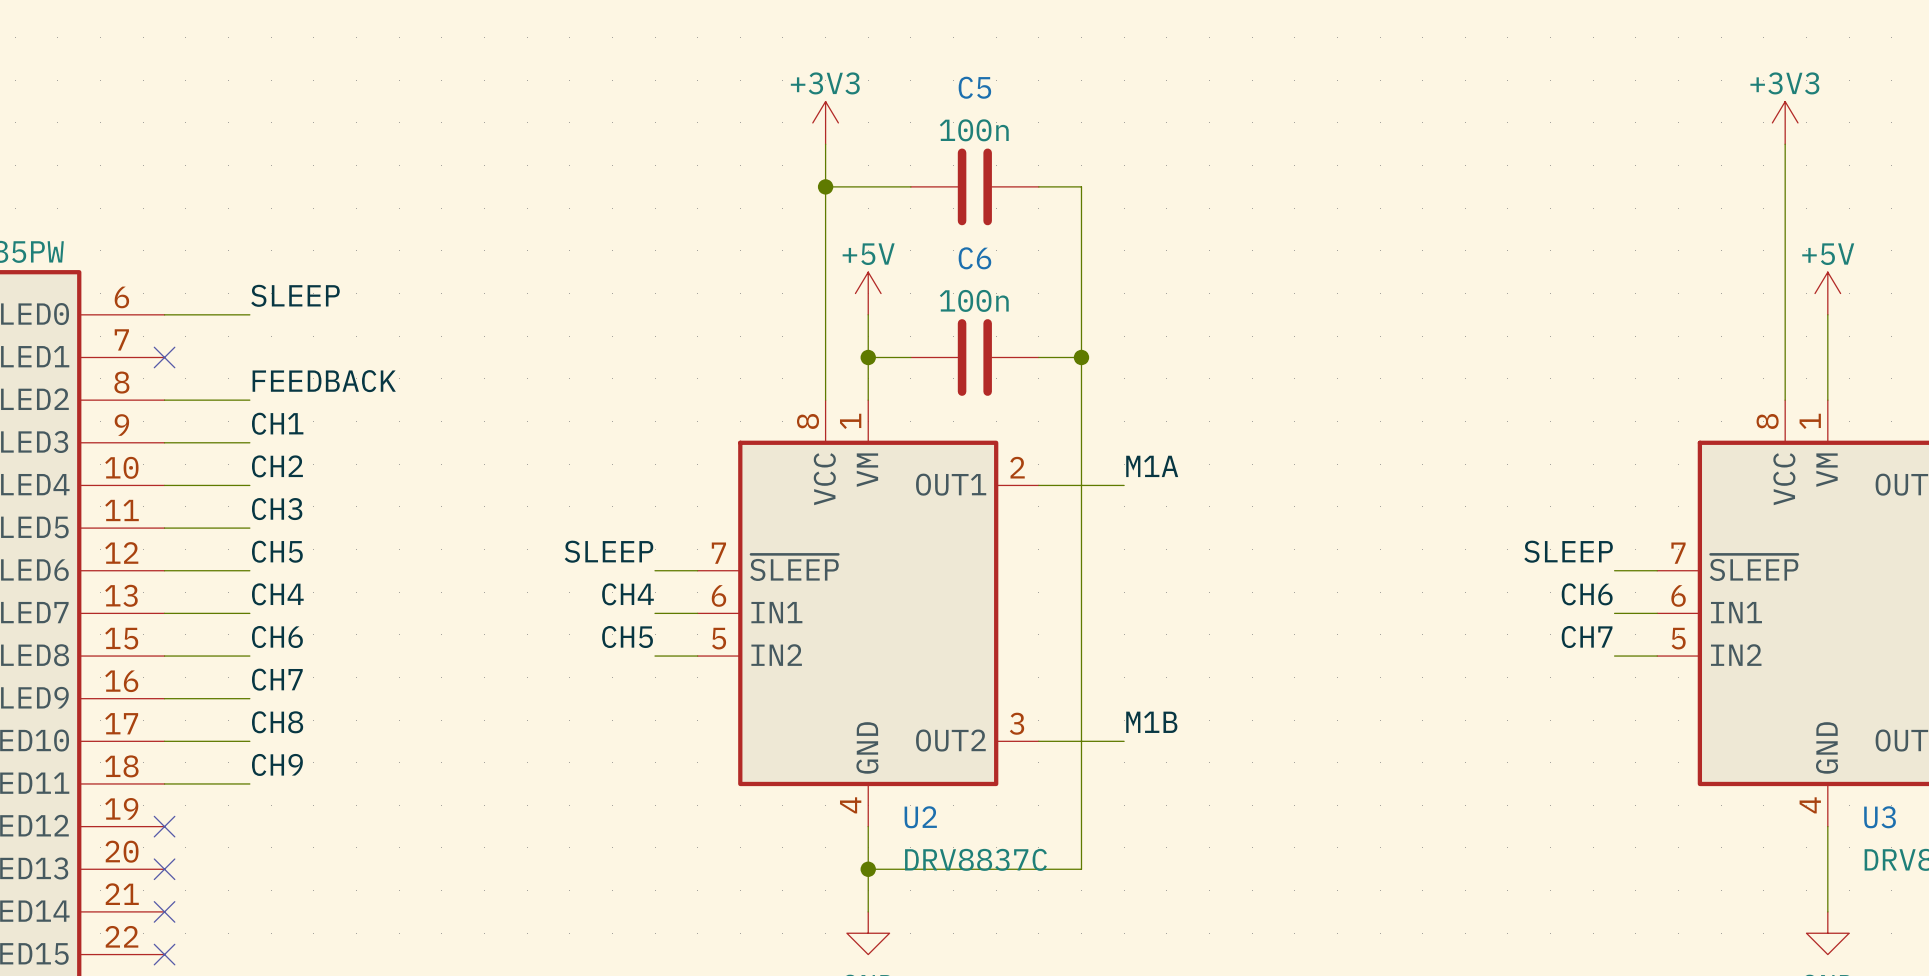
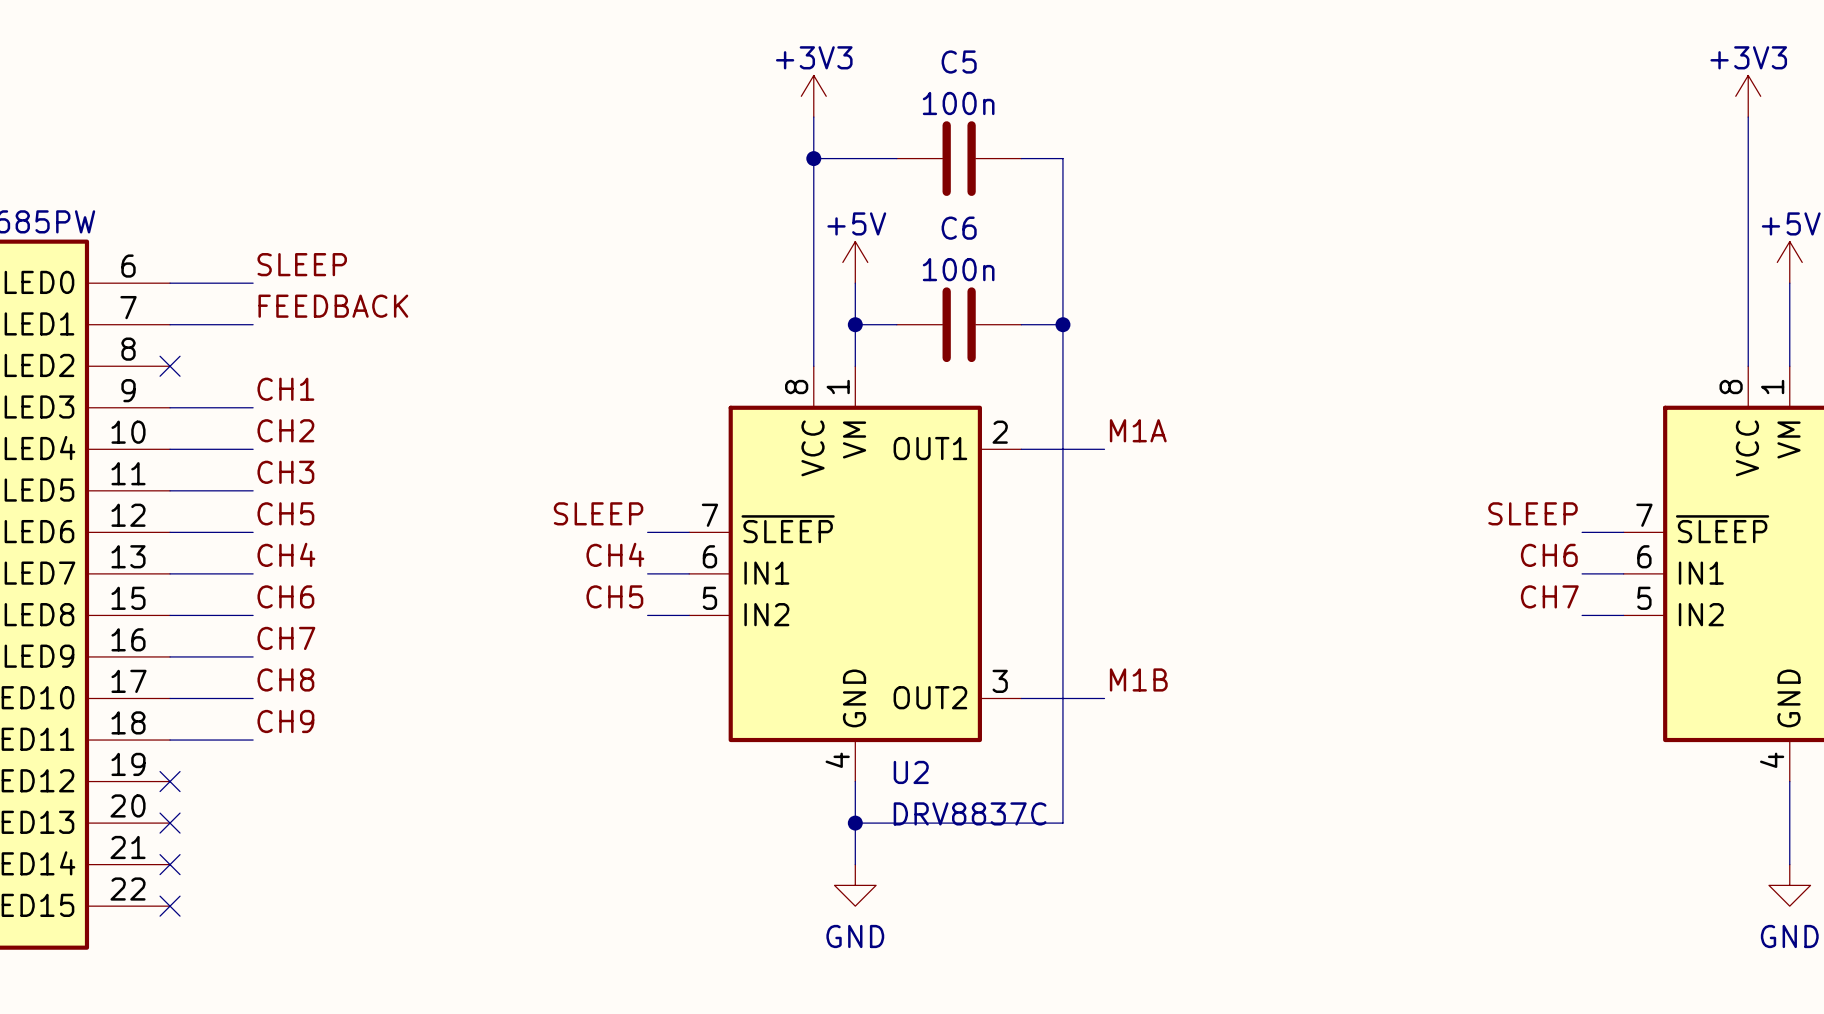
no-connect mark position: (164, 357) -> (170, 366)
label position: FEEDBACK (324, 381) -> FEEDBACK (333, 306)
wire: (164, 400) (249, 400) -> (170, 324) (253, 324)

